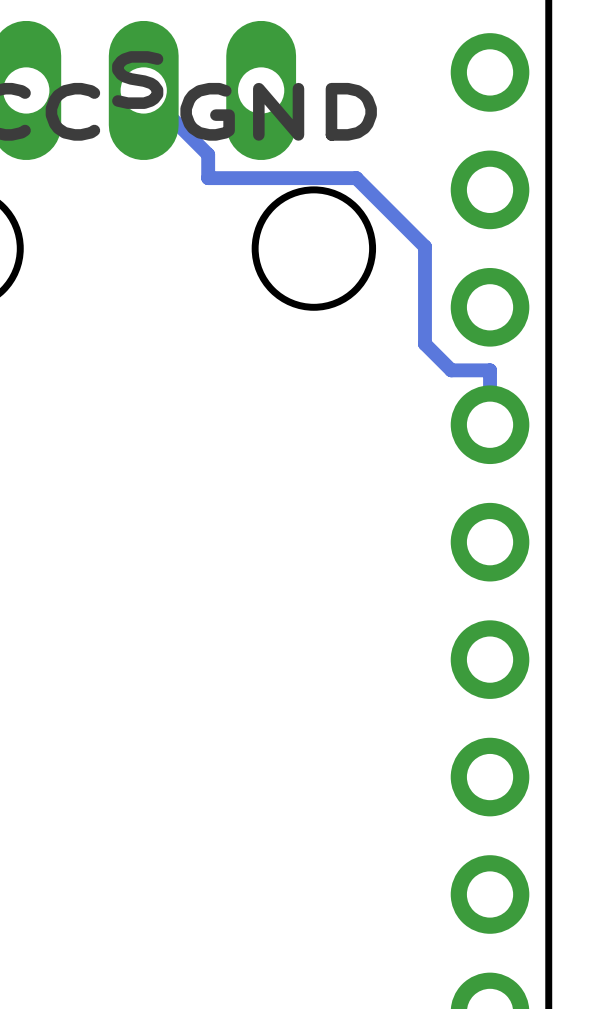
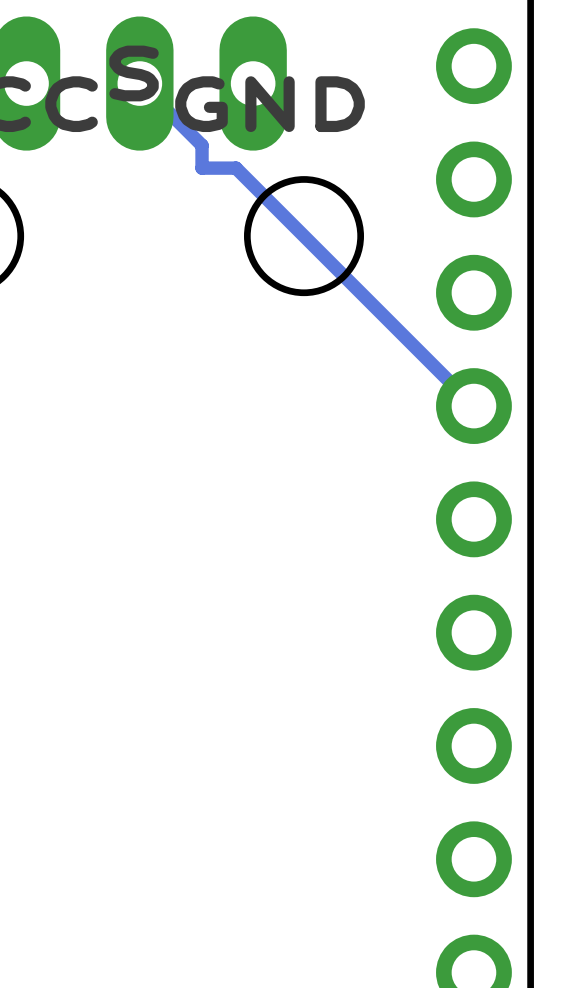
track: (243, 178) (356, 178) (424, 246) (424, 344) (451, 370) (490, 370) (490, 424) -> (236, 168) (473, 406)

